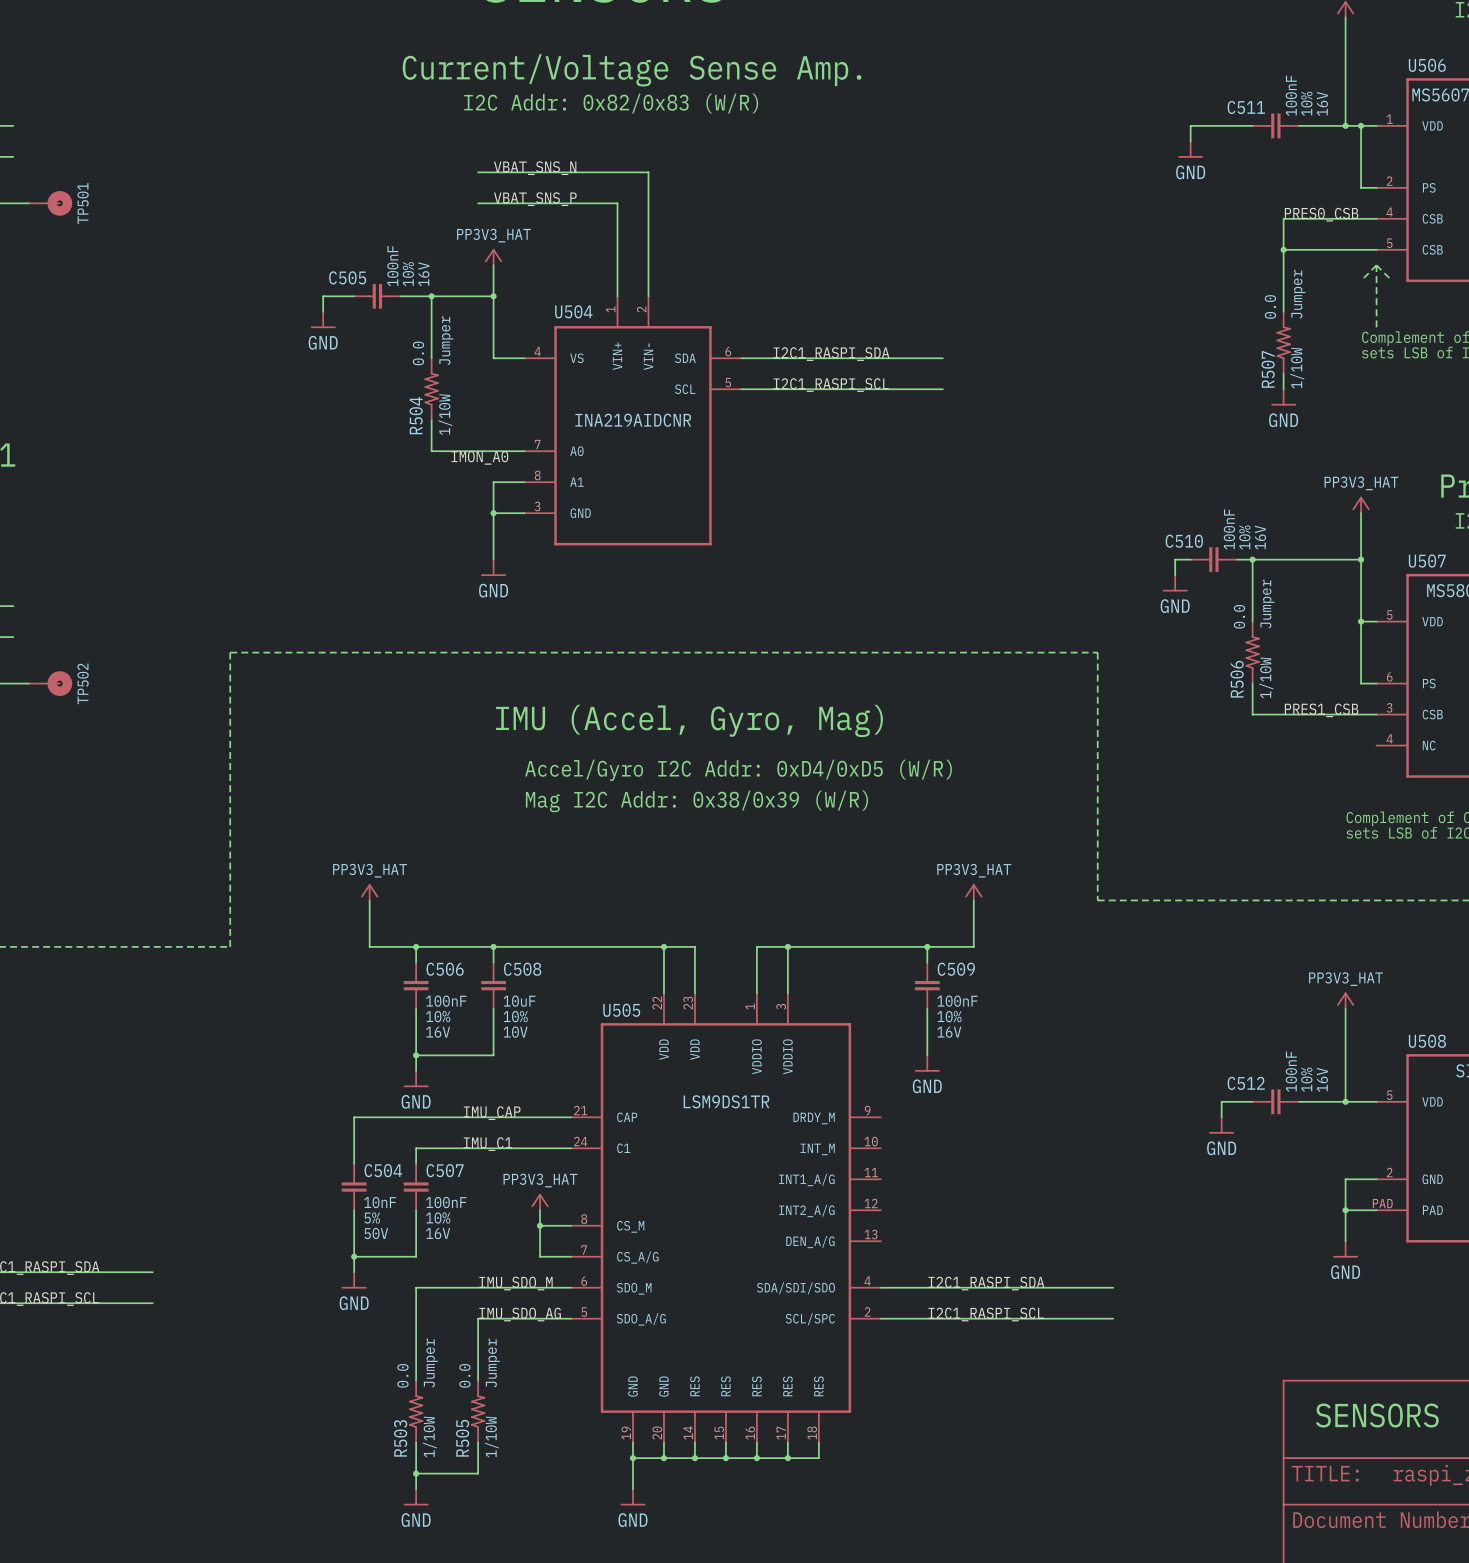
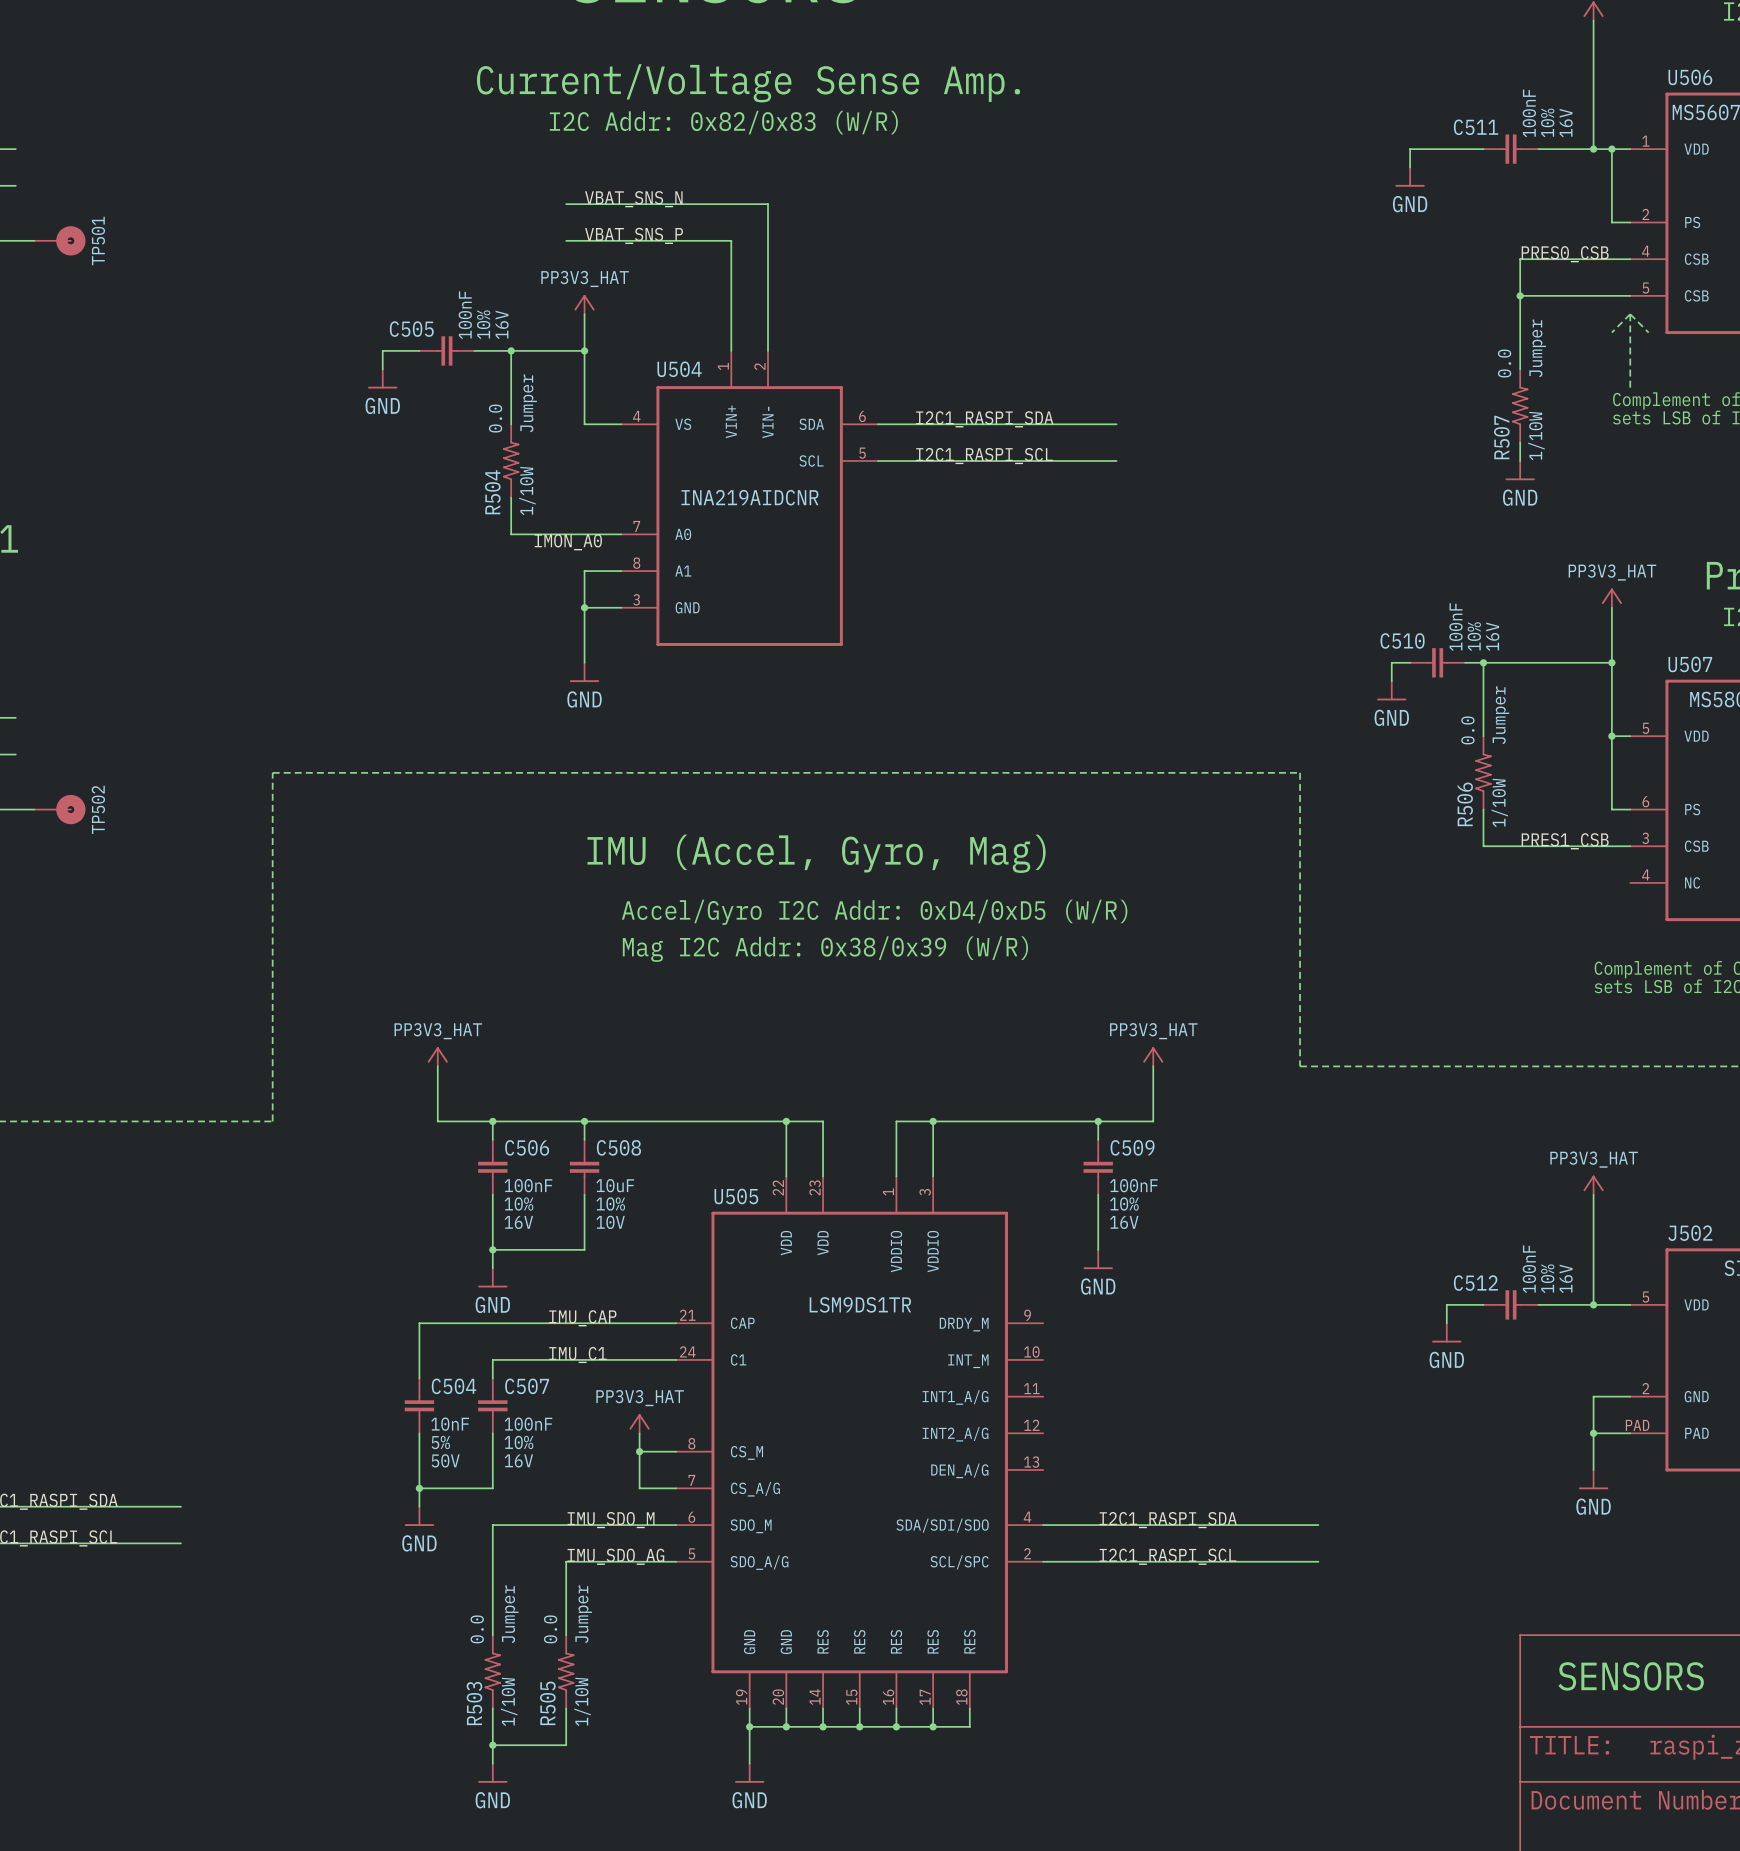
U508 name: U508 (1427, 1041) -> J502 (1690, 1233)

